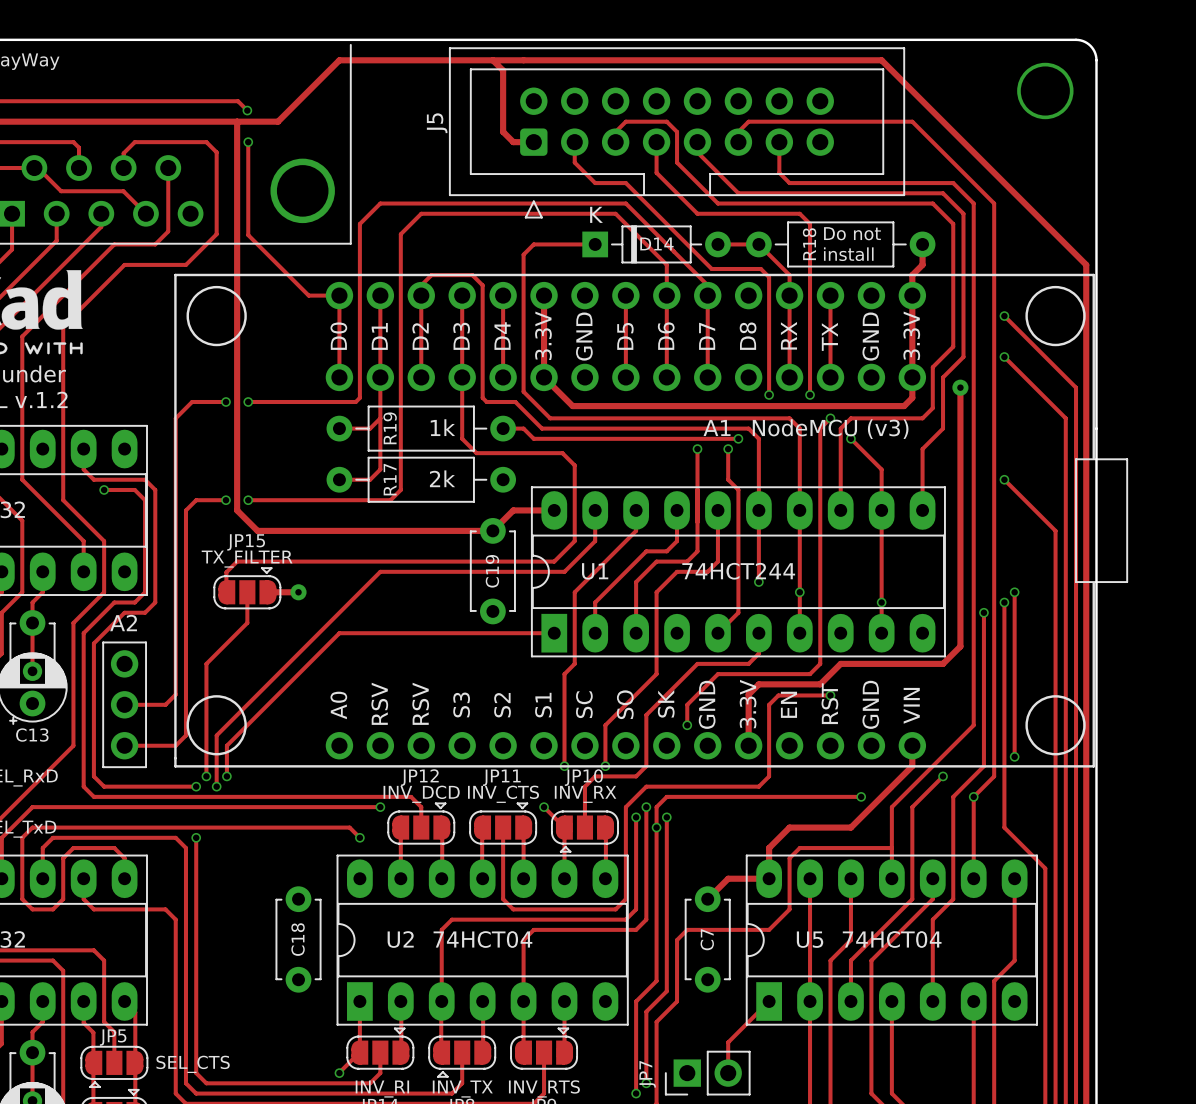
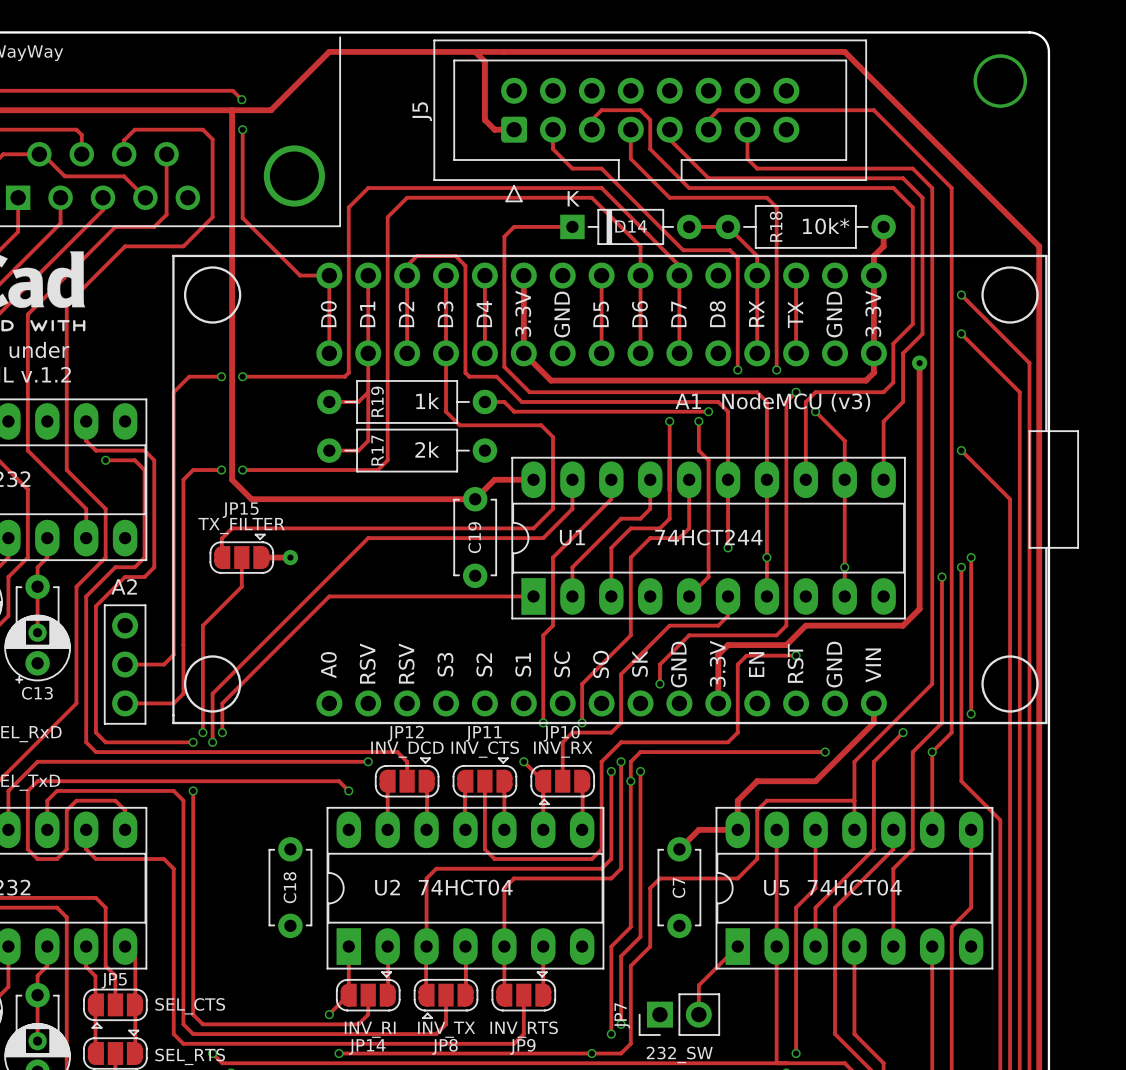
text: Do not (852, 233) -> none
R18 value: none -> 10k* (826, 226)
text: install (848, 254) -> none

